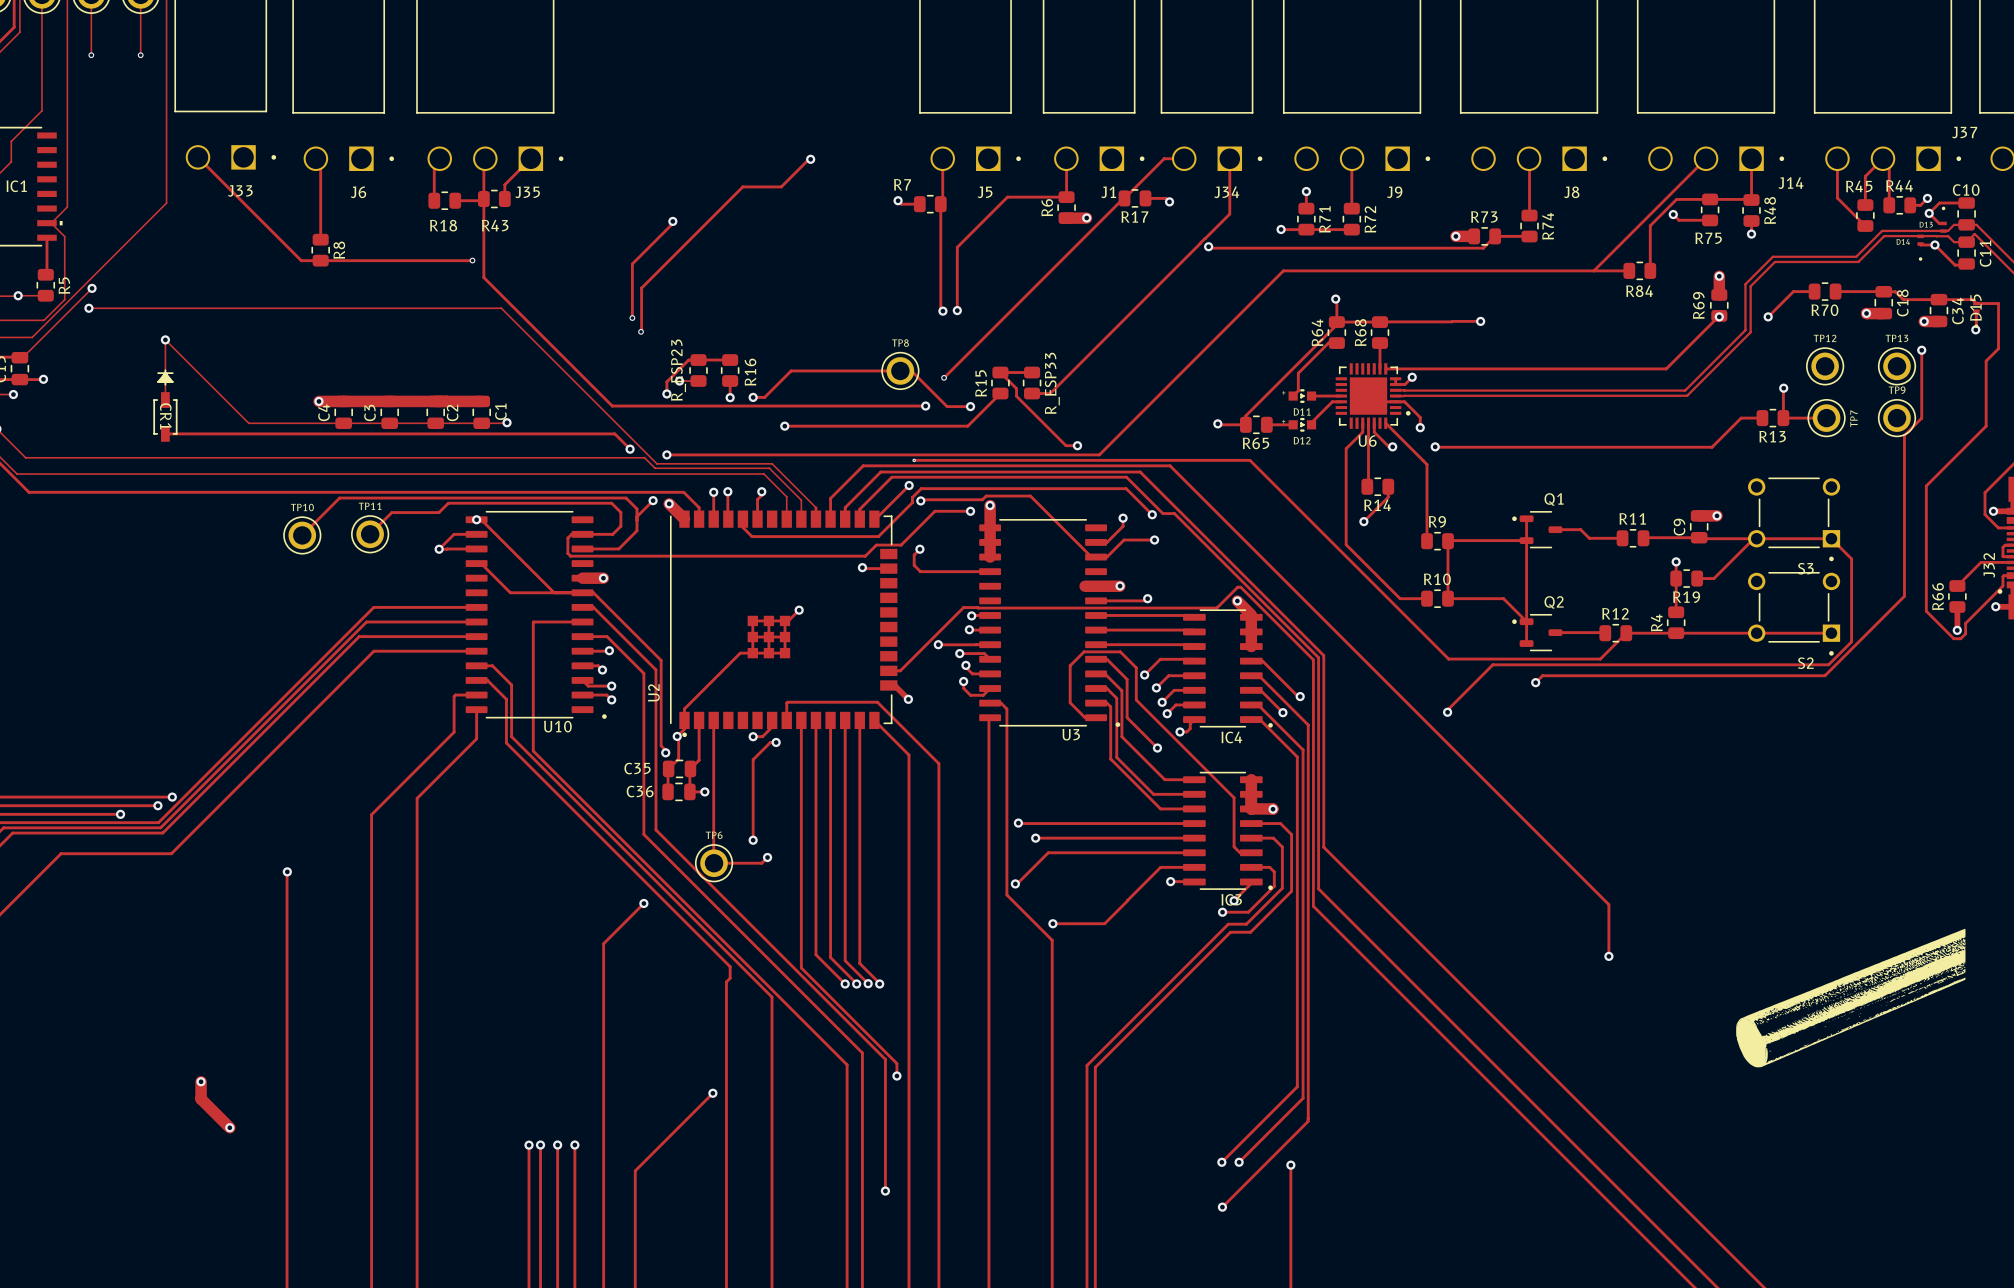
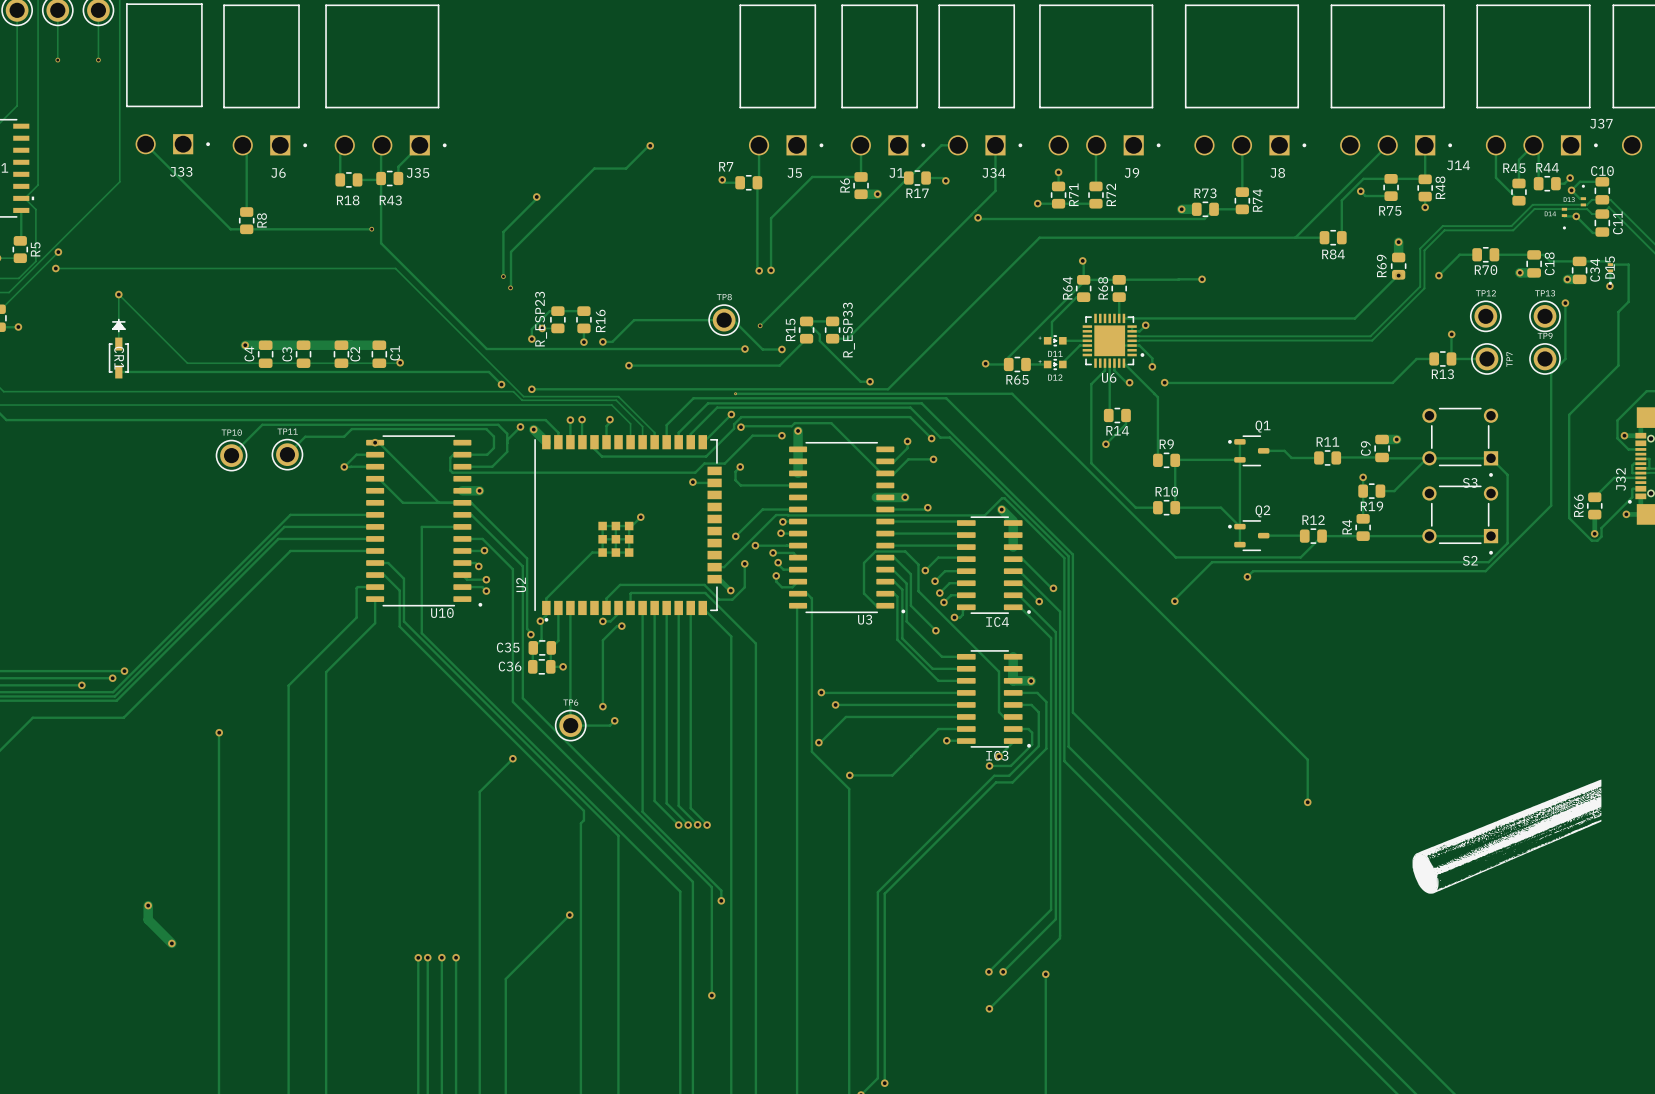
track: none -> (798, 509) (762, 509) (735, 536)
via: none -> (735, 536)
track: none -> (744, 563) (744, 587) (732, 599) (719, 599) (704, 584) (620, 584) (606, 598) (606, 607)
via: none -> (744, 563)

